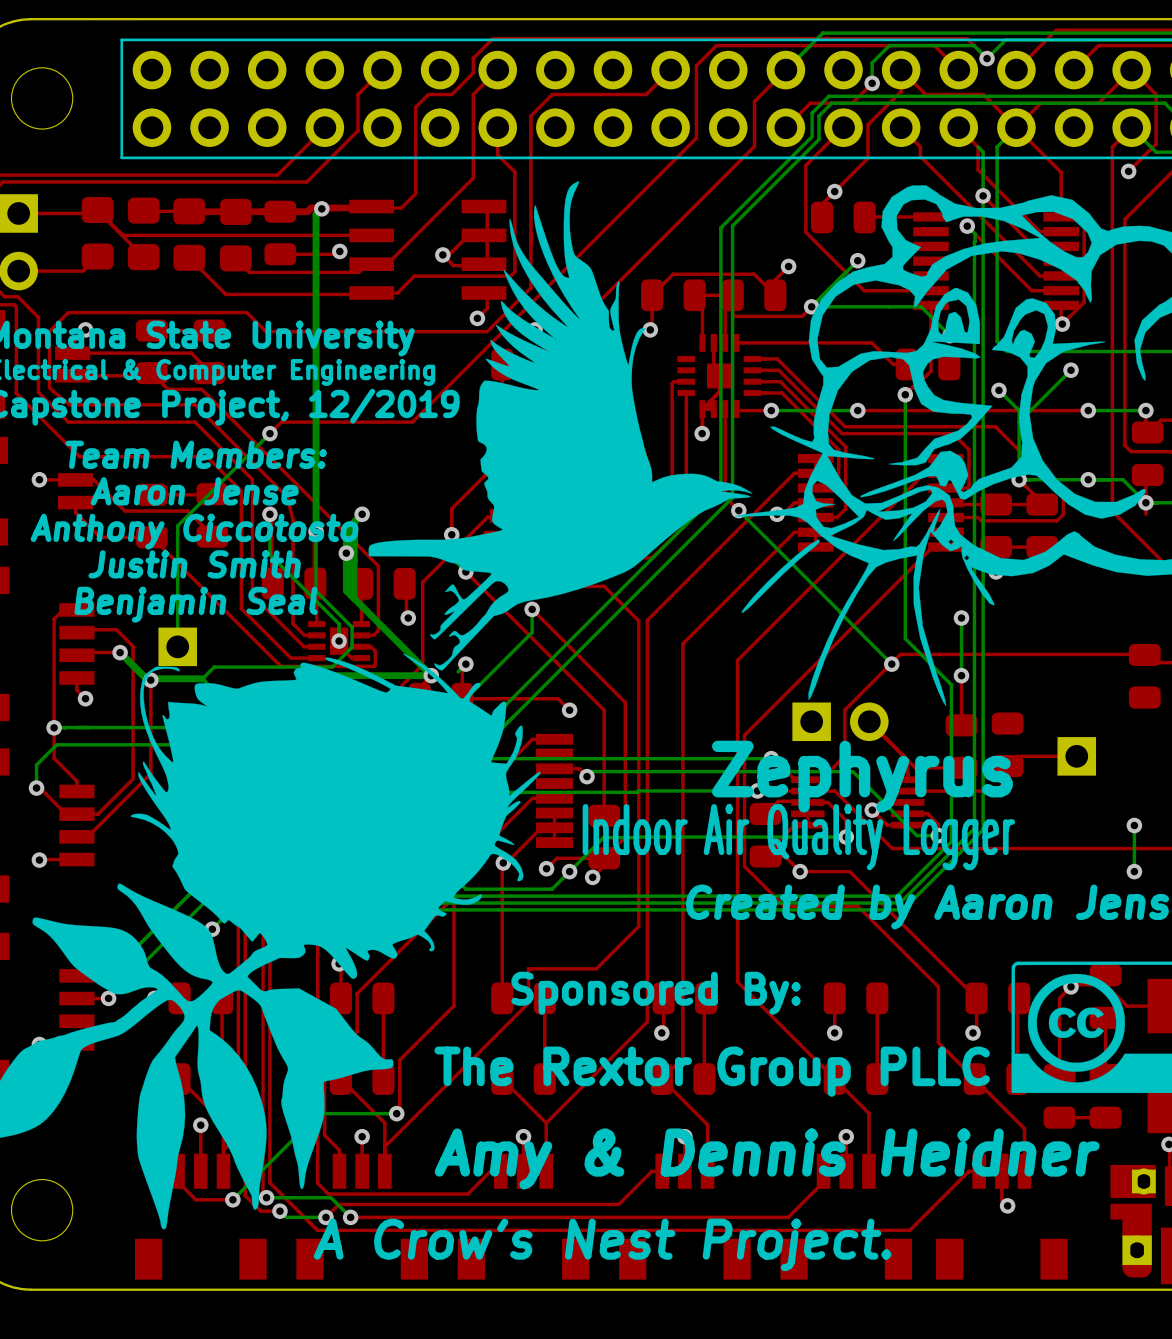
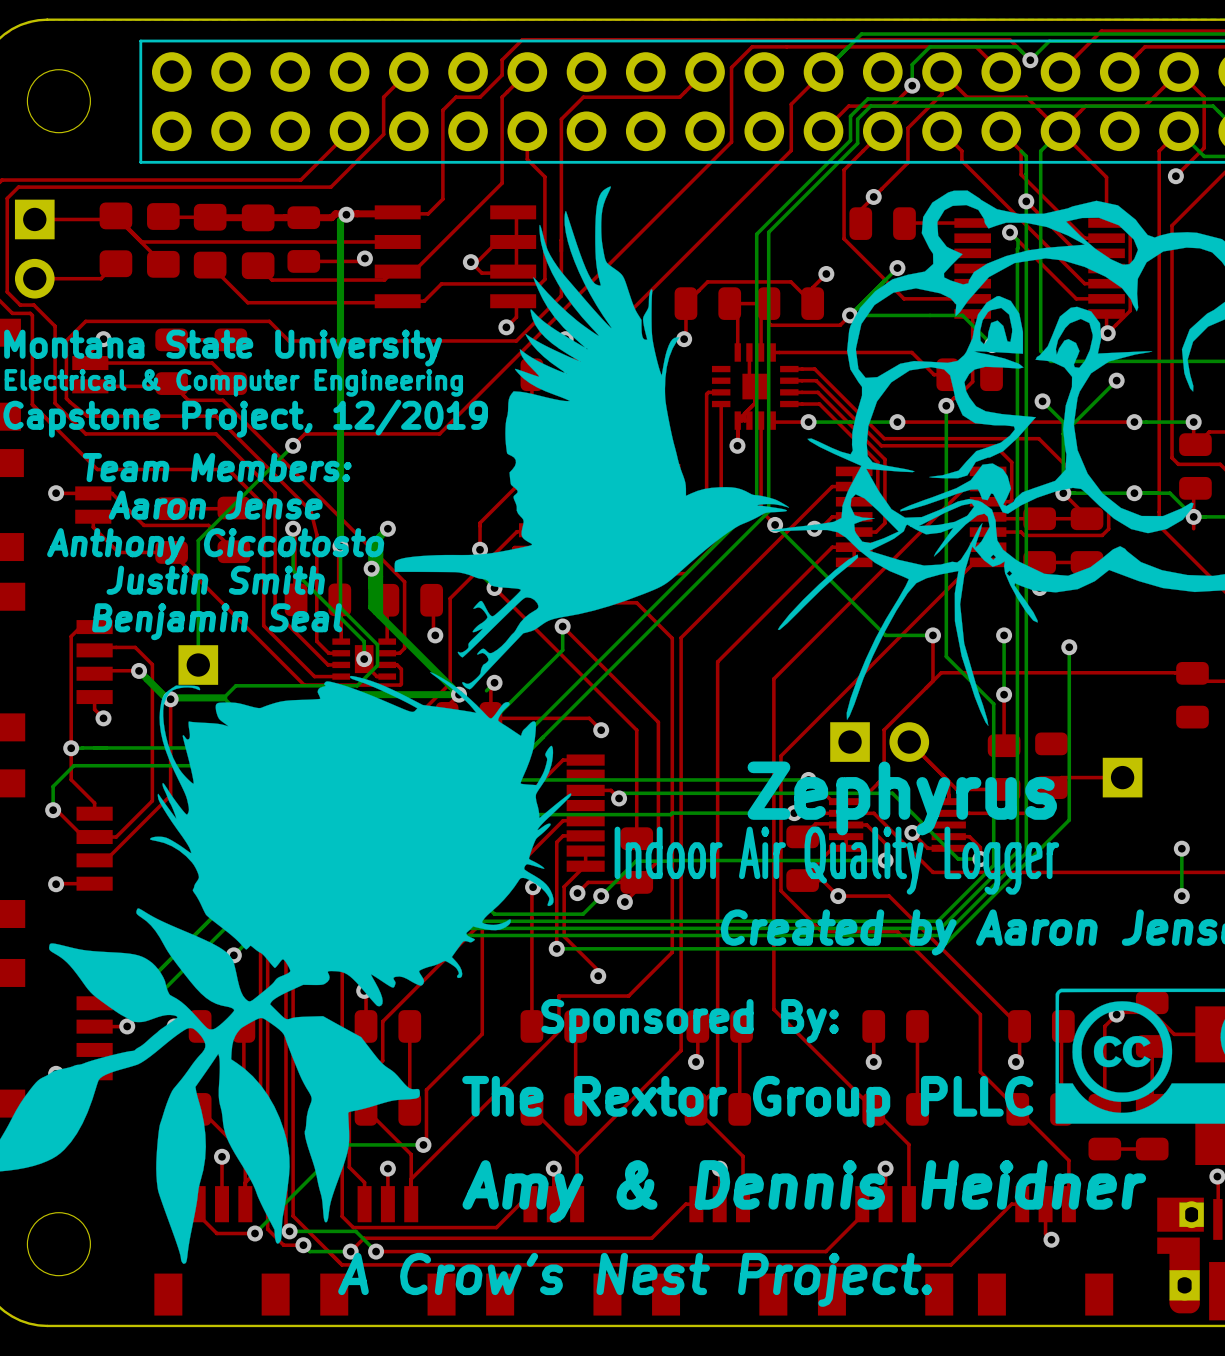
bottom track: (840, 611) (891, 664) -> (879, 629) (885, 635) (932, 635)
top track: none -> (932, 635) (932, 681)
bottom track: none -> (1069, 647) (1069, 820) (940, 948) (556, 948)
via: none -> (1069, 647)
via position: (891, 664) -> (932, 635)
top track: (554, 813) (554, 827) (541, 827) (506, 862) (503, 862) -> (585, 835) (563, 835) (556, 842) (556, 948)
top track: none -> (584, 866) (564, 886) (564, 936) (598, 970) (598, 976)
via: none -> (556, 948)
via: none -> (598, 976)

